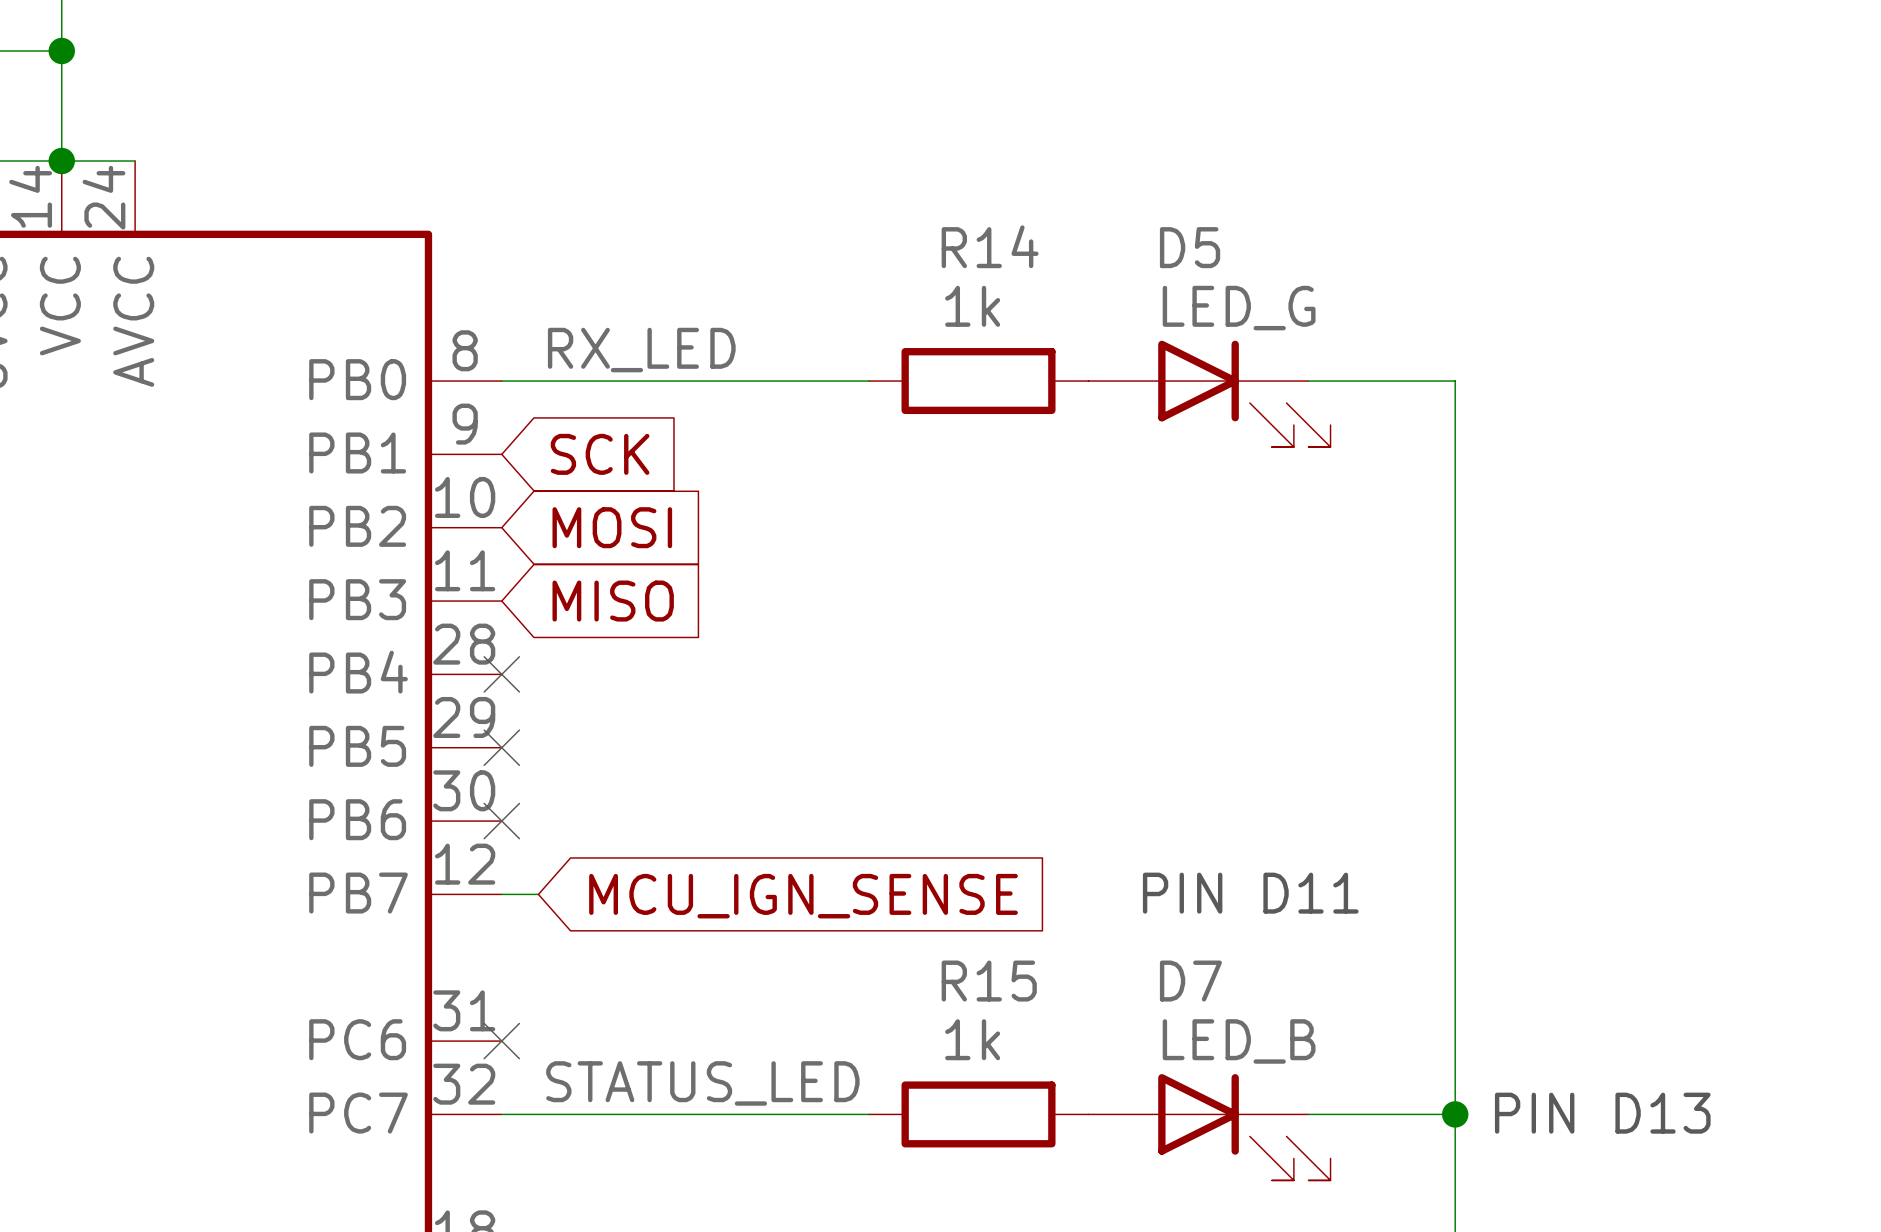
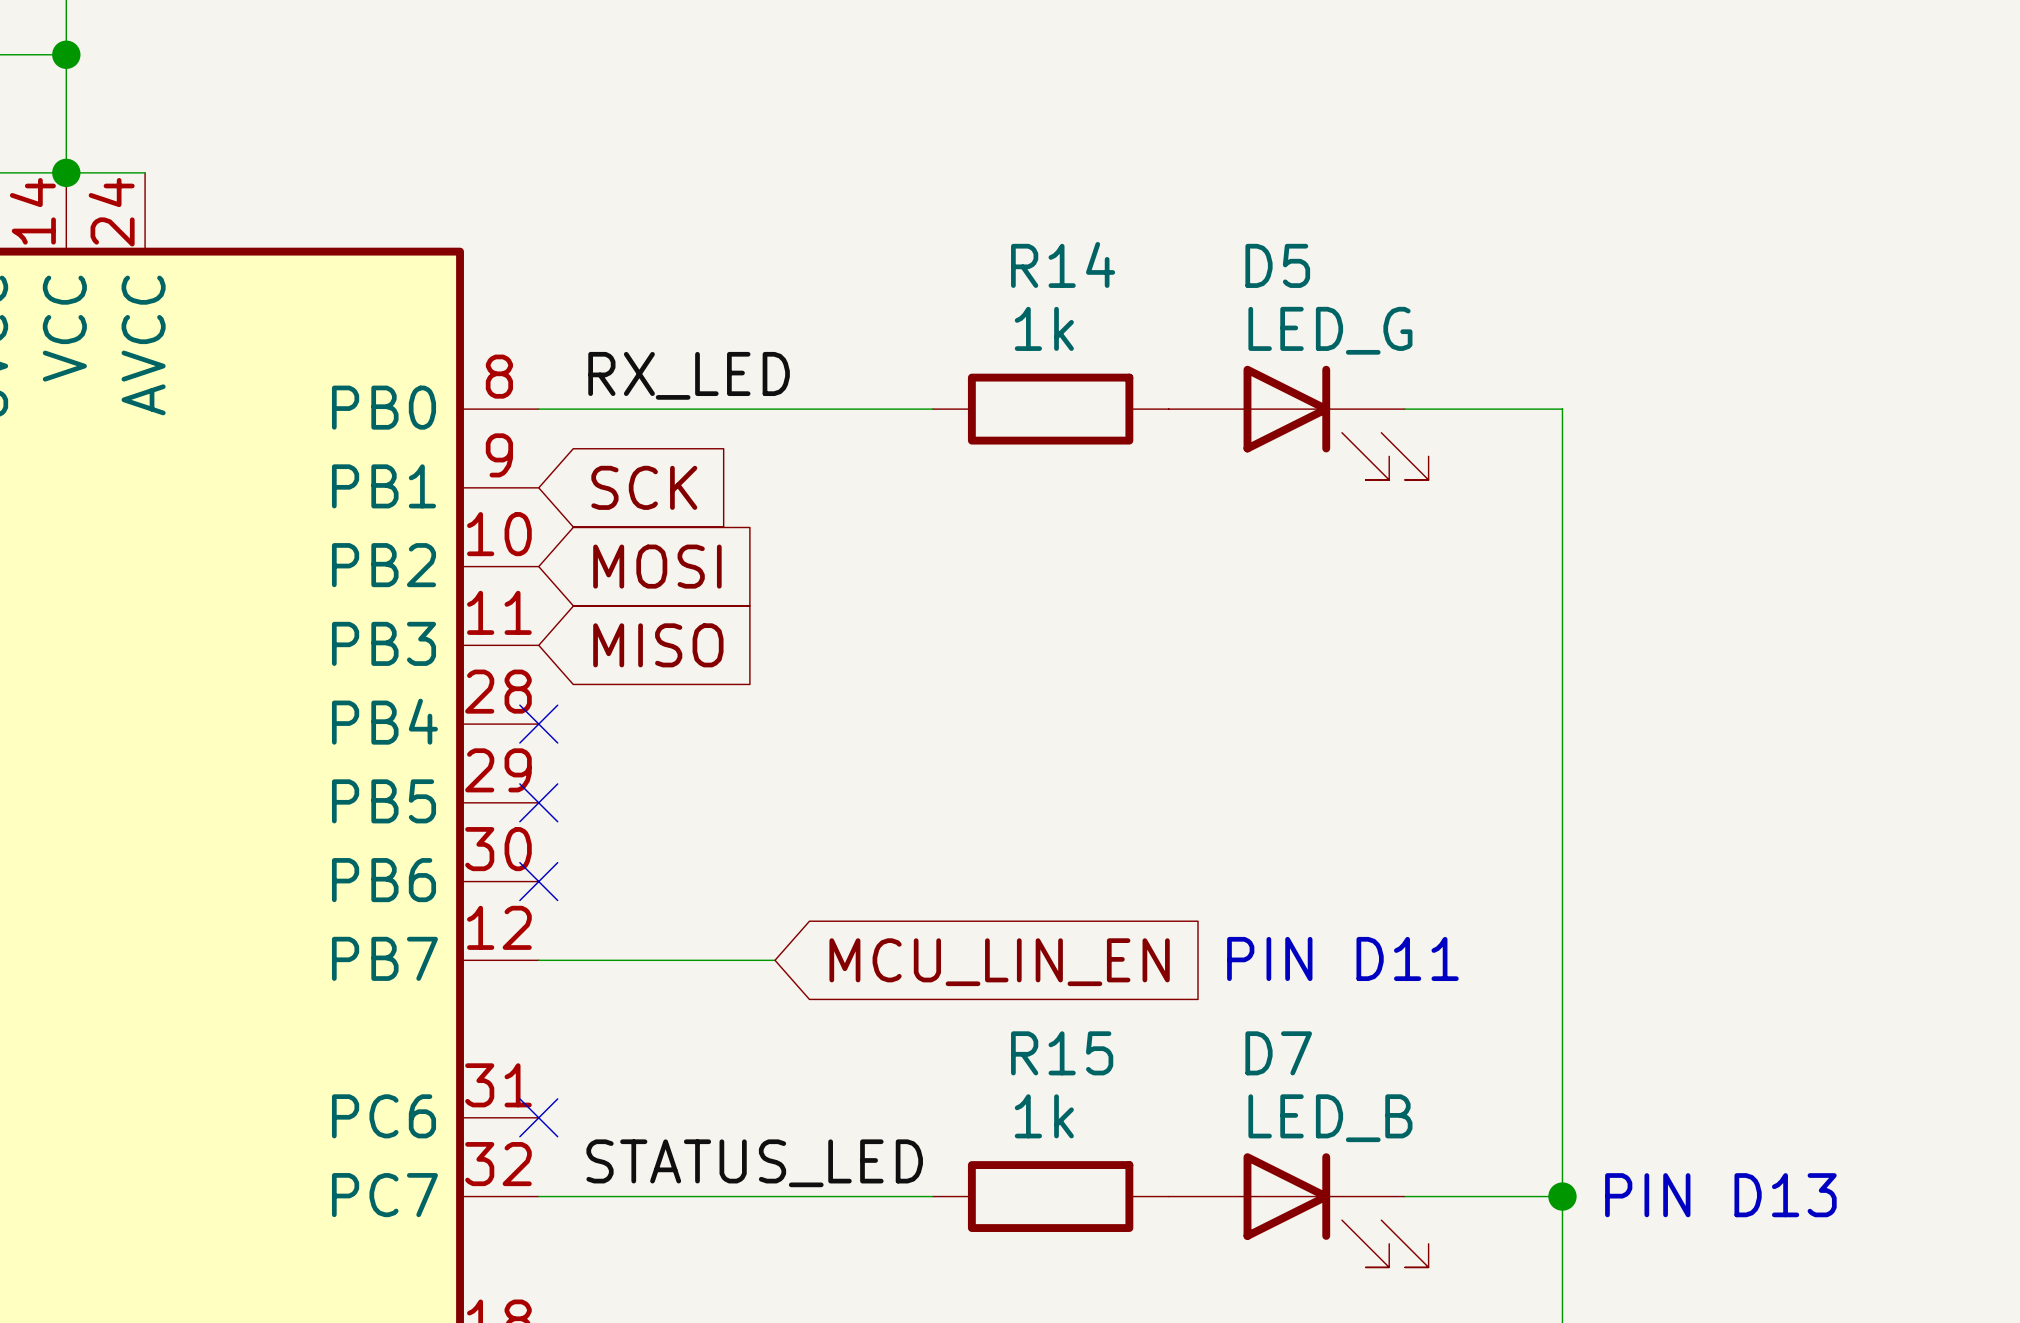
wire: none -> (578, 960) (775, 960)
global label: MCU_IGN_SENSE (803, 896) -> MCU_LIN_EN (999, 962)

